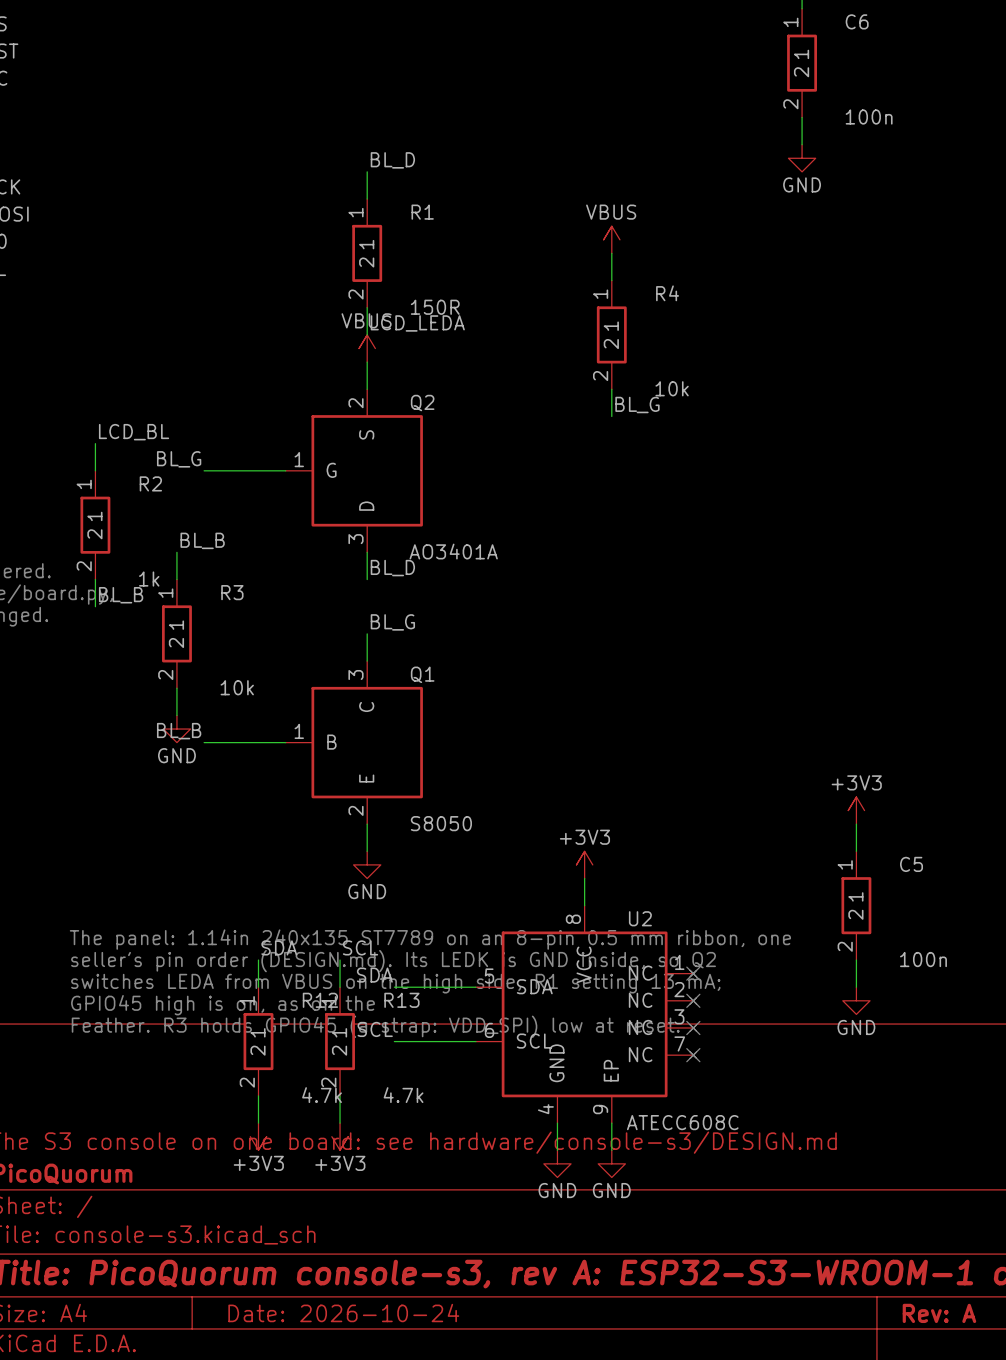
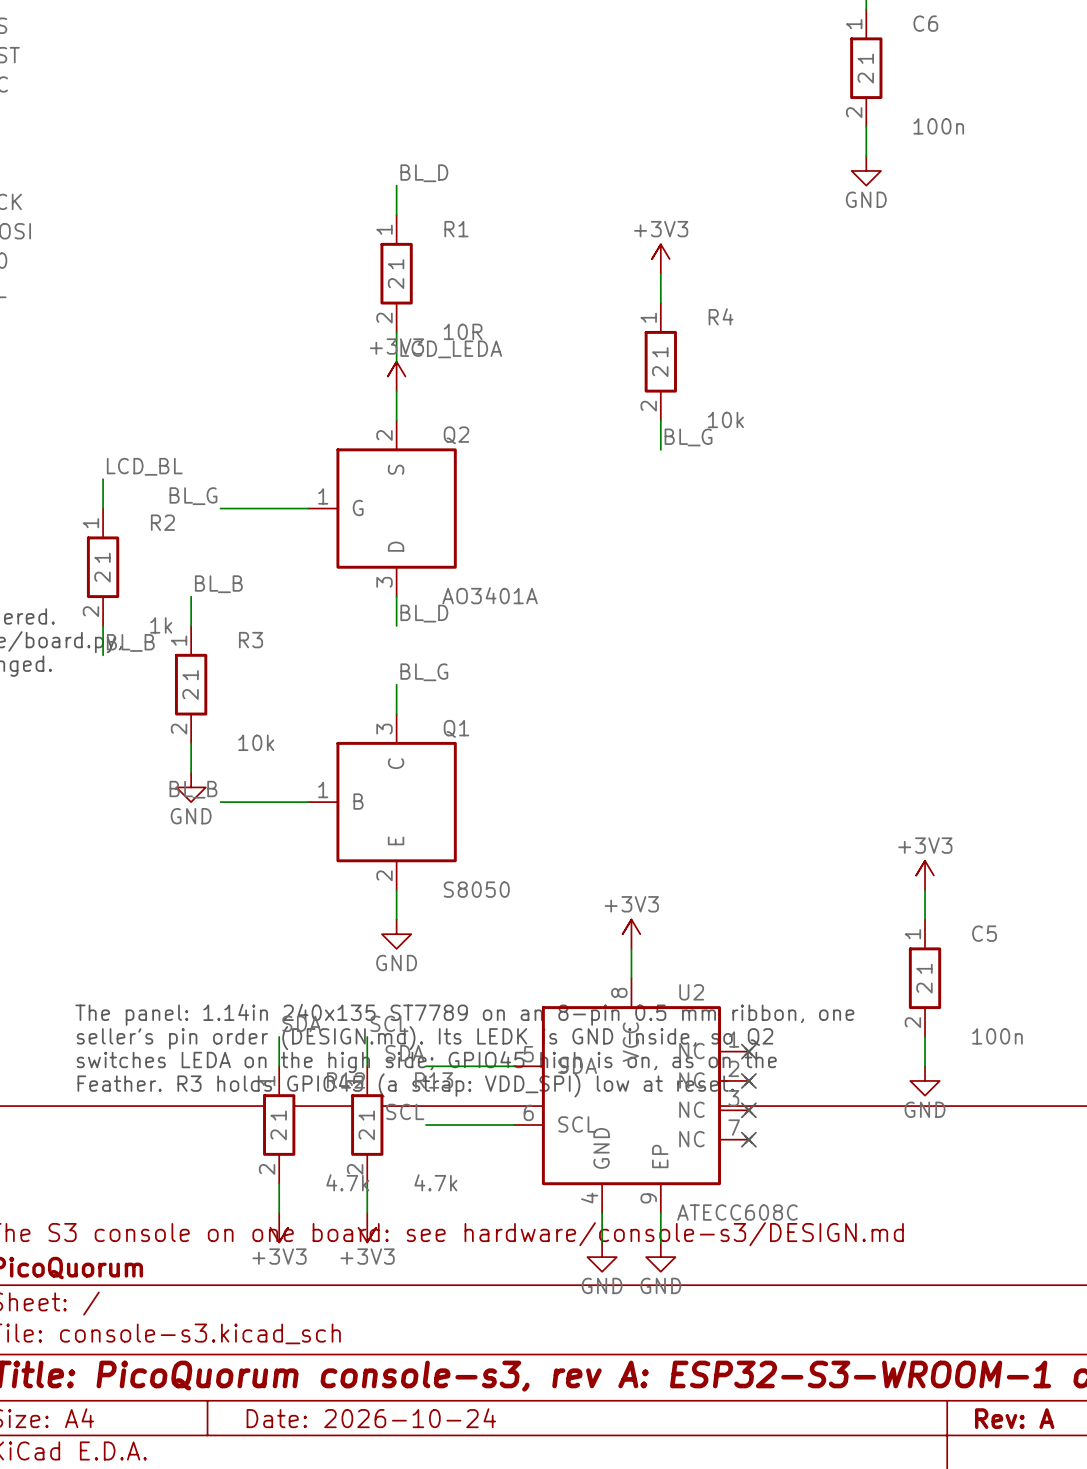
power symbol: VBUS (611, 239) -> +3V3 (660, 259)
R1 value: 150R (435, 307) -> 10R (463, 331)
power symbol: VBUS (367, 348) -> +3V3 (396, 376)
text: switches LEDA from VBUS on the high side, R1 setting 13 mA; (395, 983) -> switches LEDA on the high side; GPIO45 high is on, as on the (426, 1062)
text: GPIO45 high is on, as on the (223, 1005) -> Feather. R3 holds GPIO45 (a strap: VDD_SPI) low at reset. (405, 1085)
text: Feather. R3 holds GPIO45 (a strap: VDD_SPI) low at reset. (375, 1026) -> none

